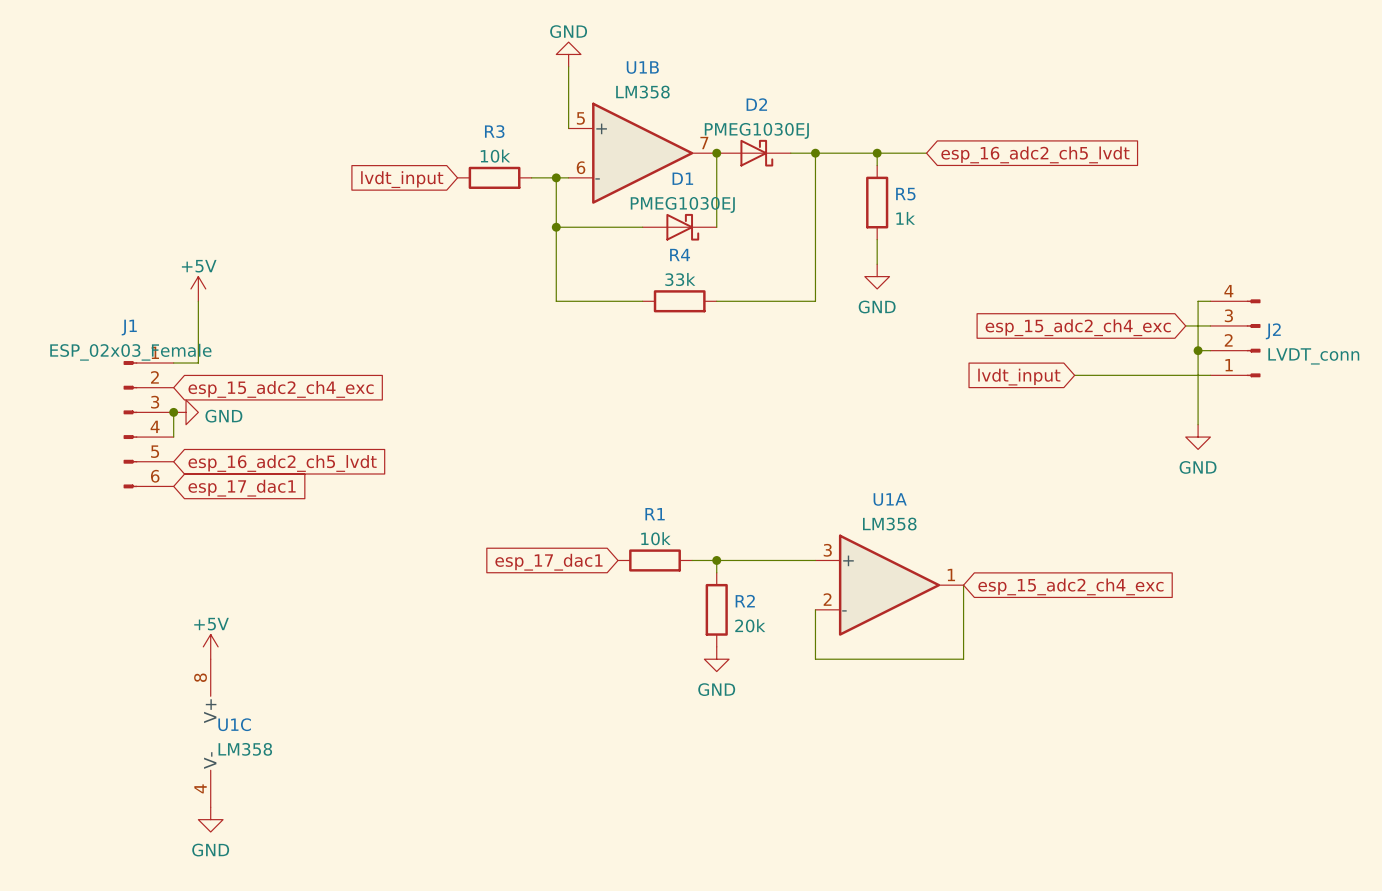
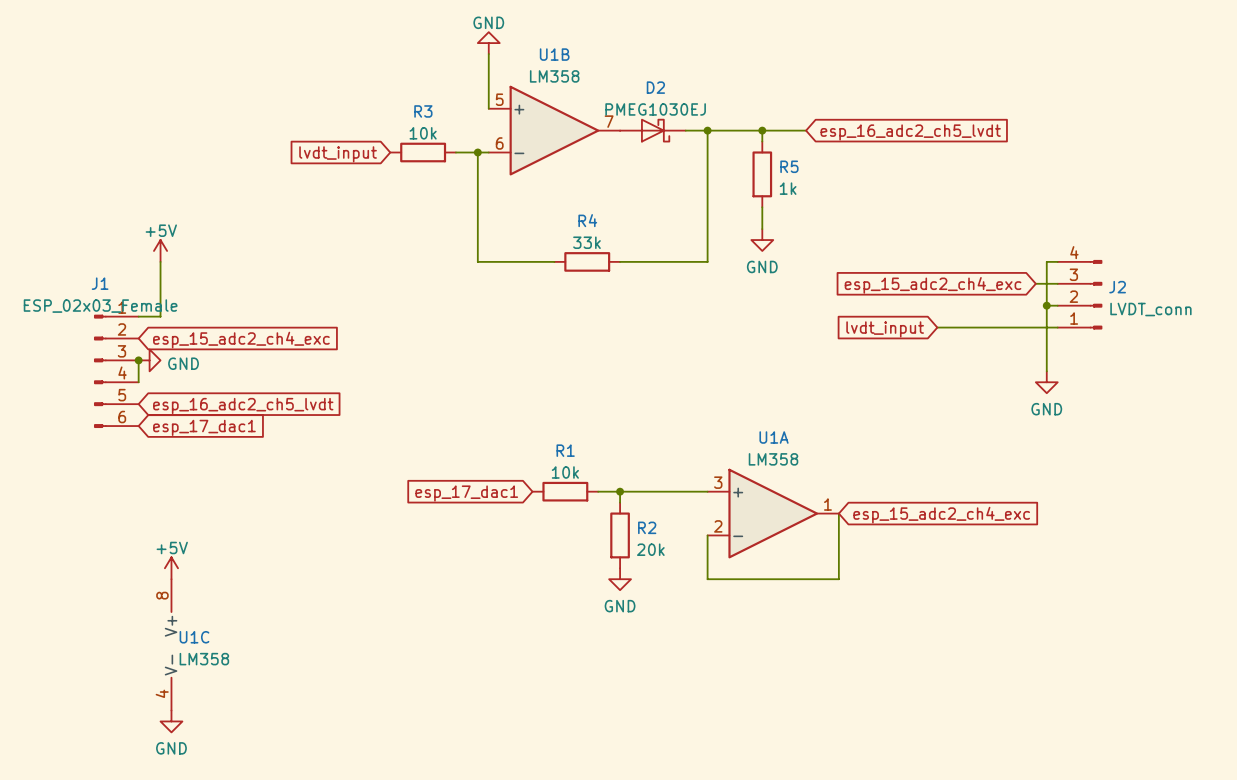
wire: (716, 153) (716, 227) -> none
junction: (716, 153) -> none
wire: (556, 227) (642, 227) -> none
junction: (556, 227) -> none
D1: PMEG1030EJ (679, 227) -> none

